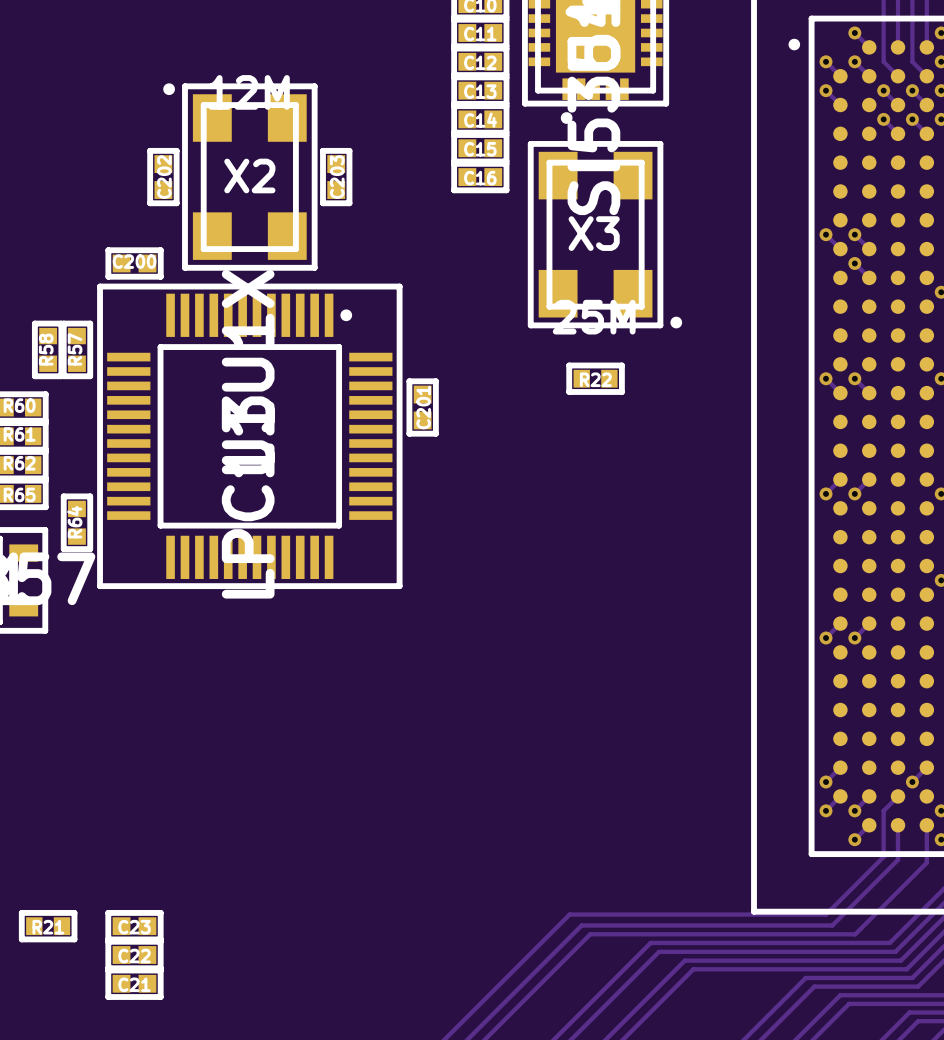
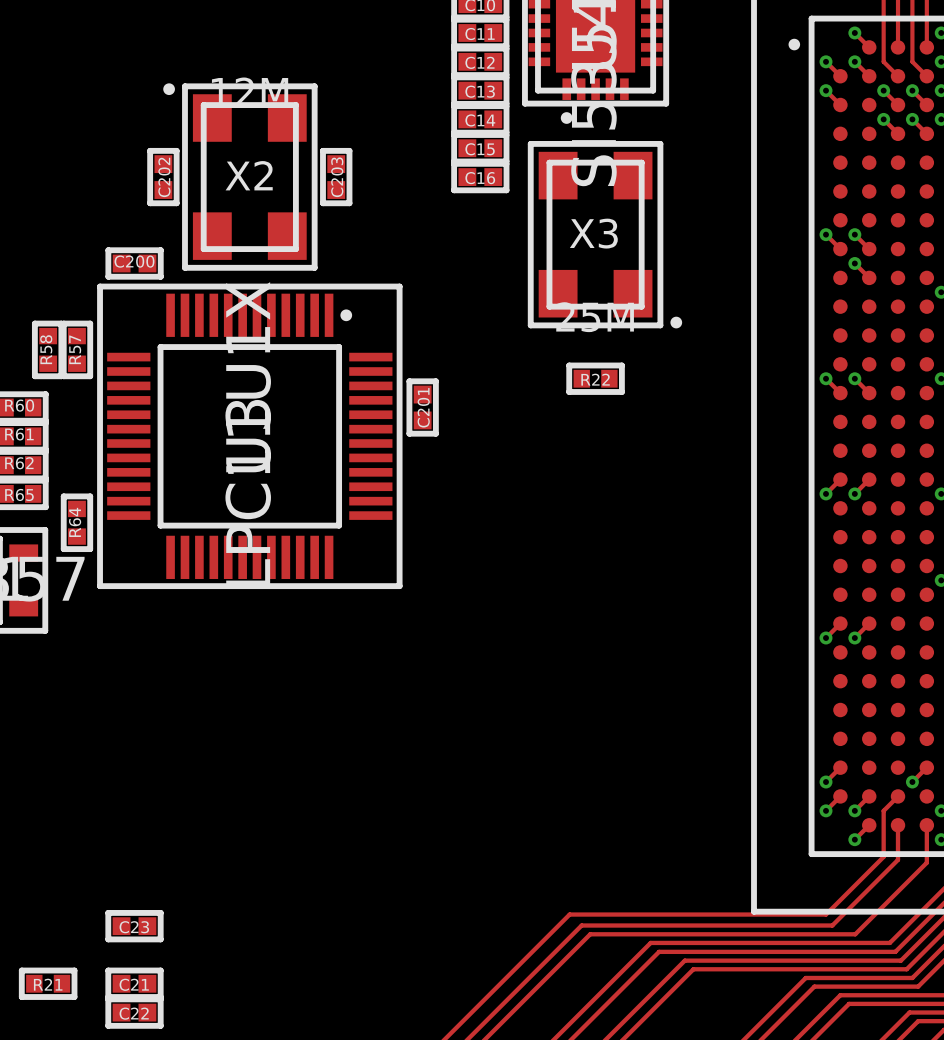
R21 position: (48, 926) -> (48, 983)
C22 position: (134, 955) -> (134, 1012)

